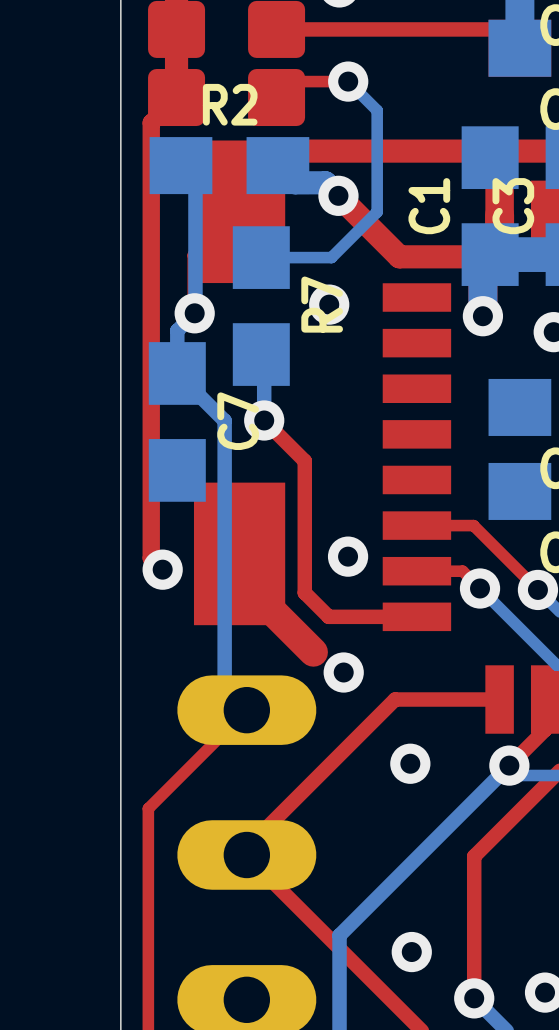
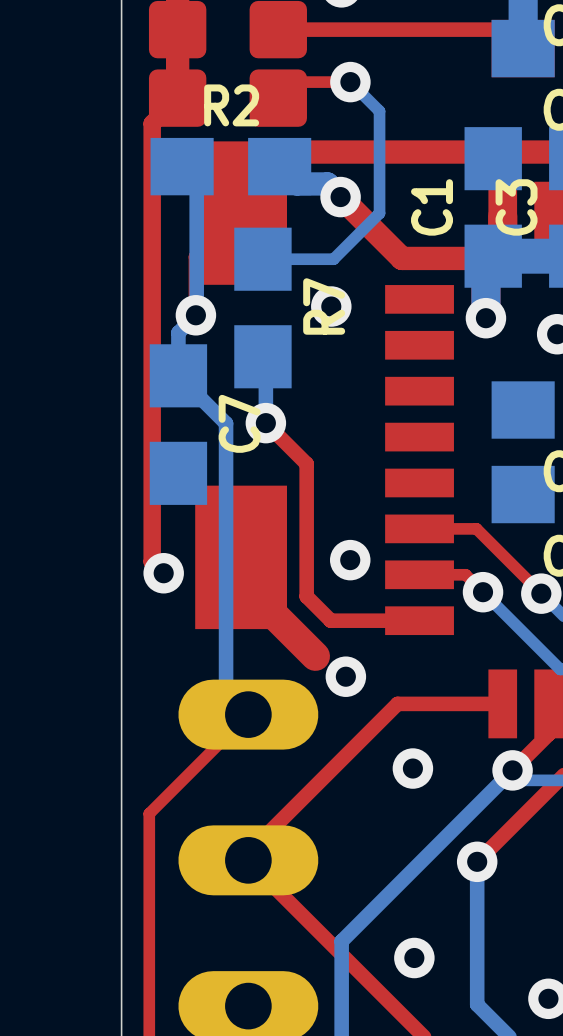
top track: (474, 856) (474, 998) -> none
bottom track: none -> (477, 861) (477, 1004)
via position: (474, 998) -> (477, 861)

